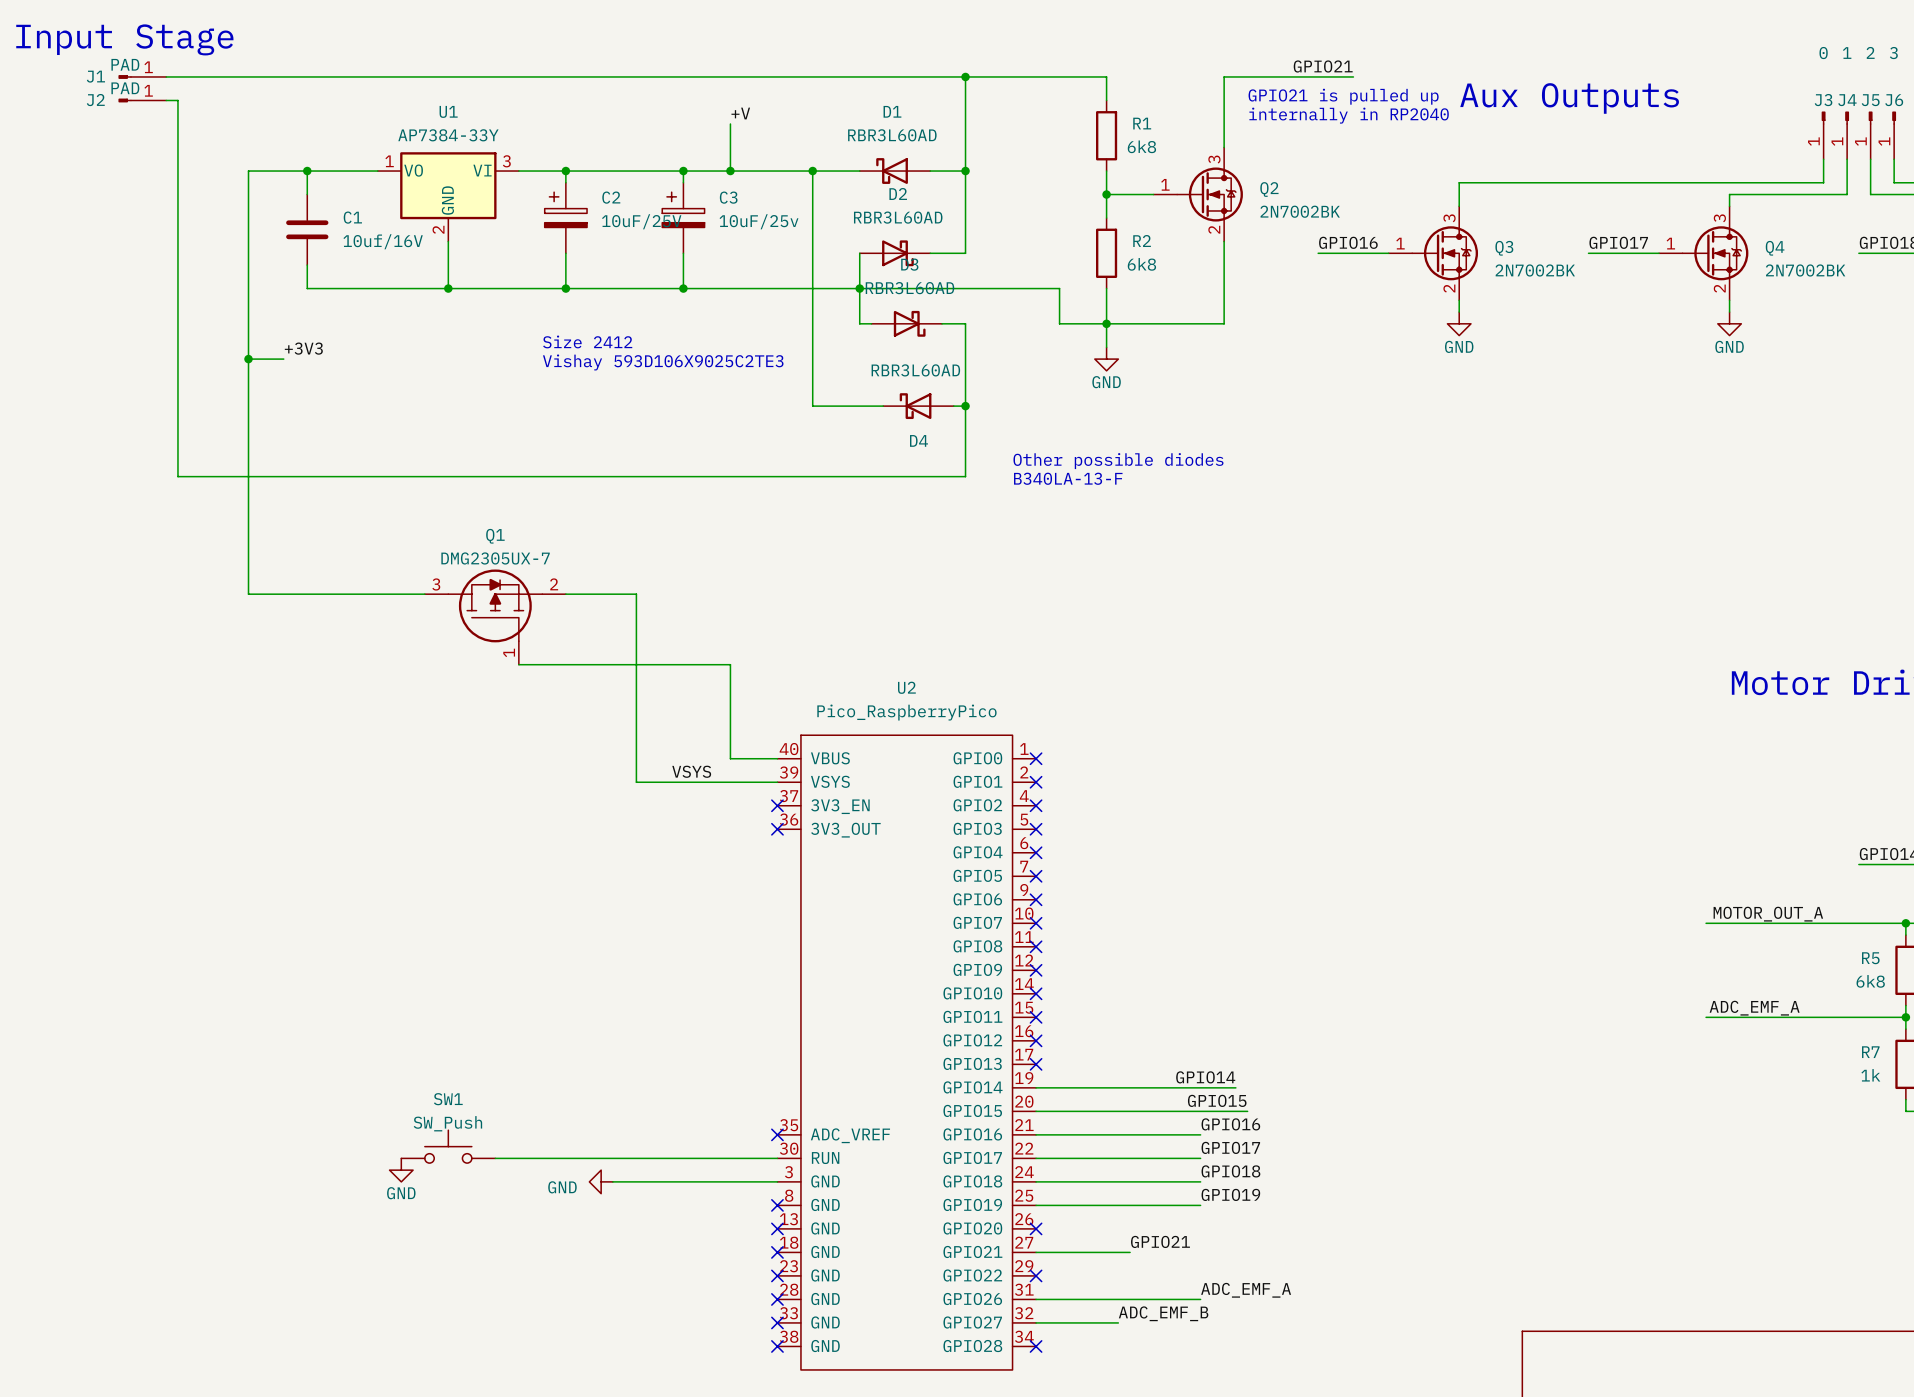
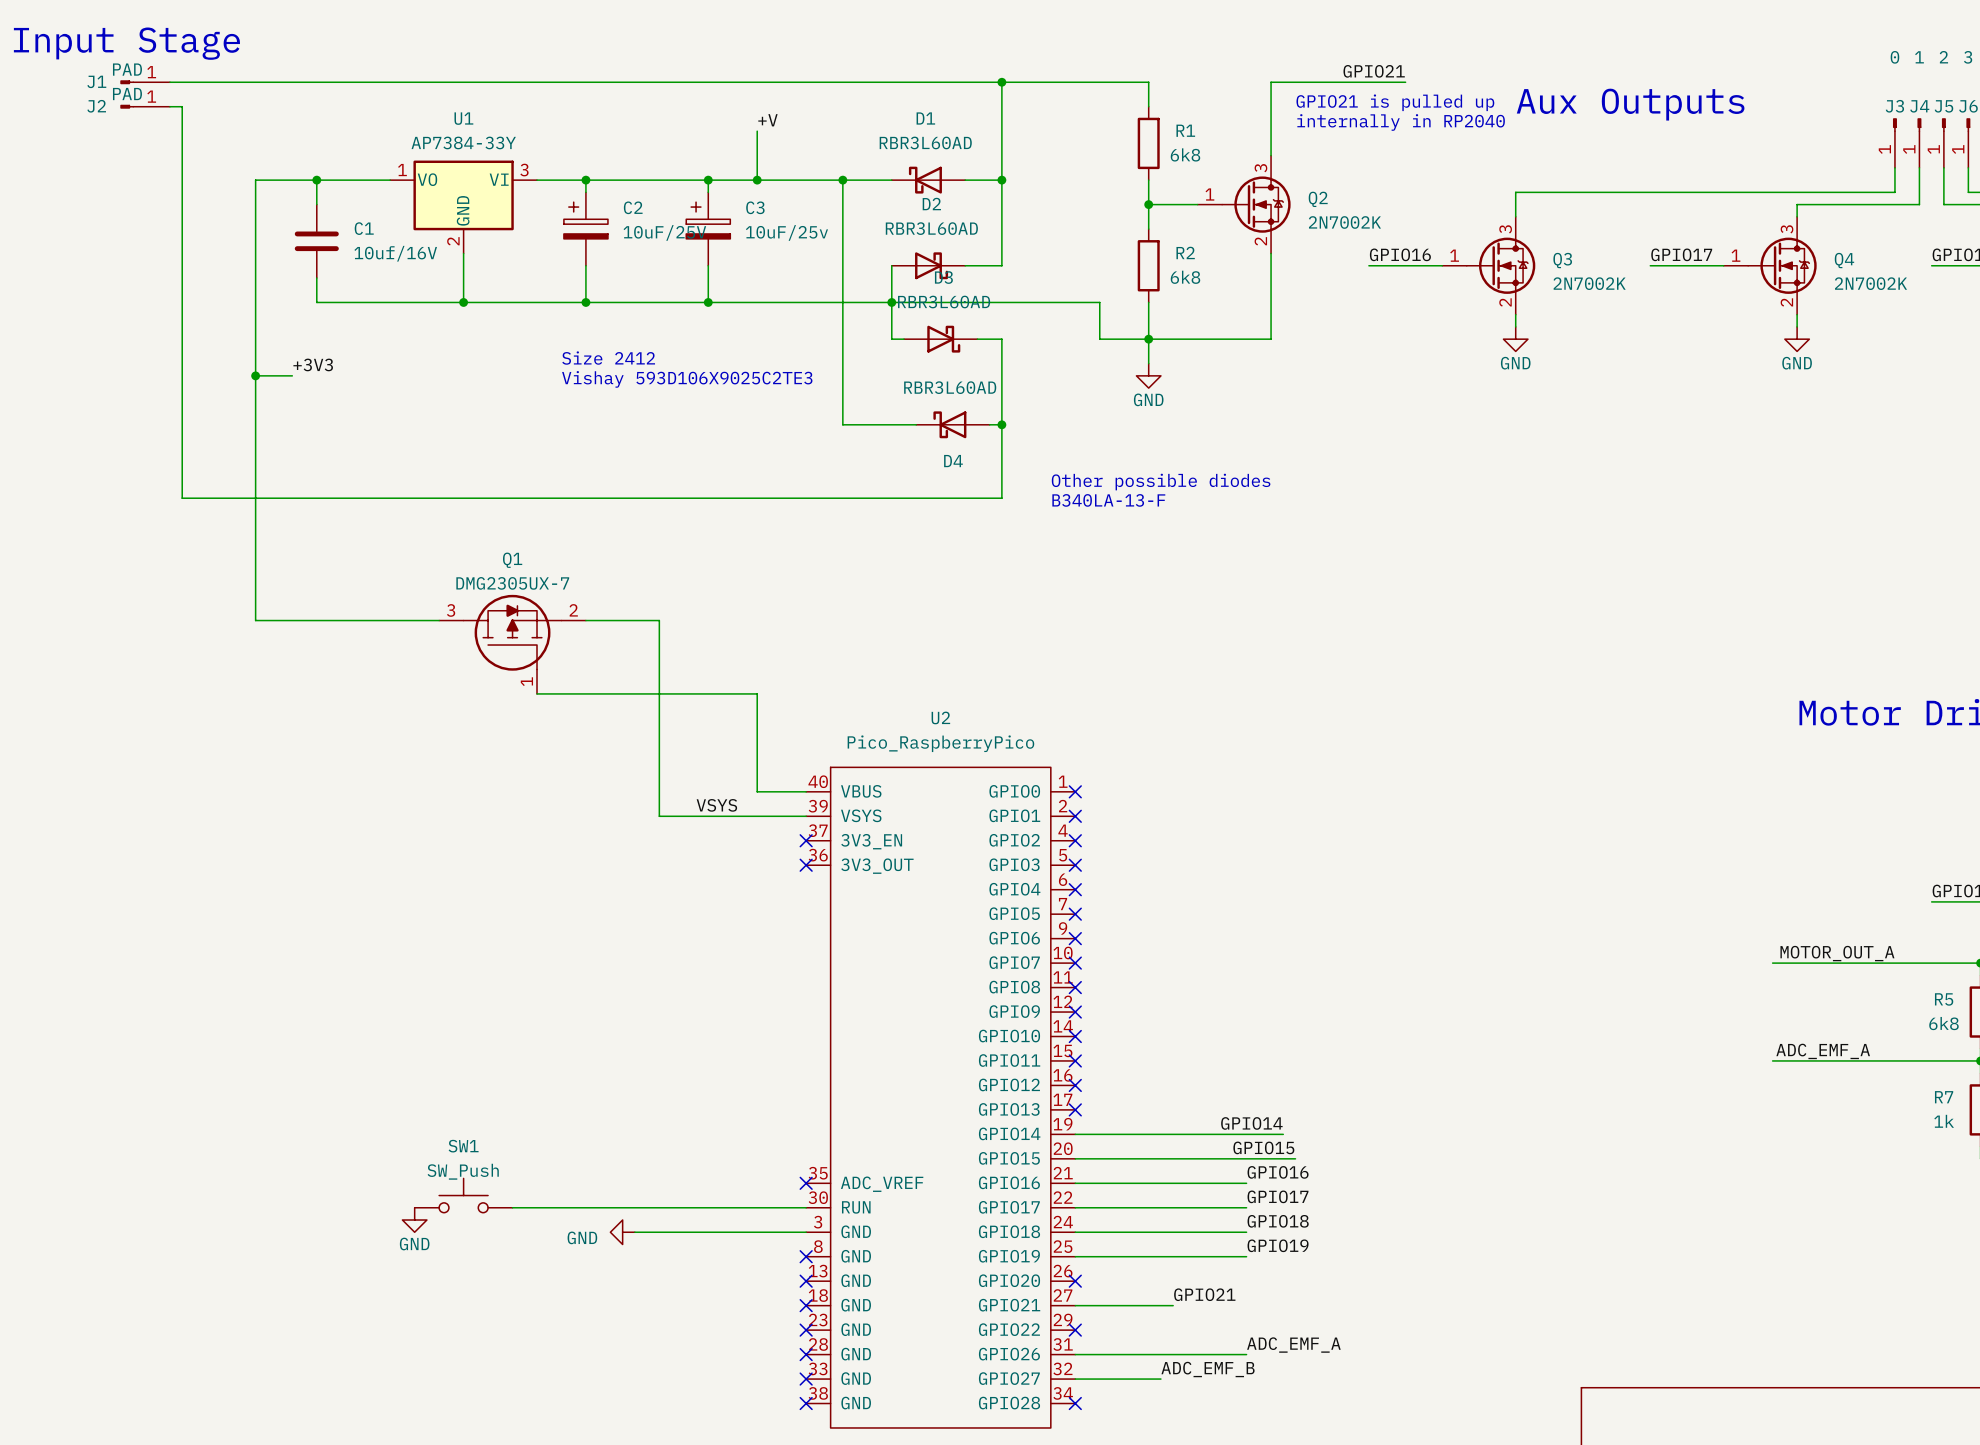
Q2 value: 2N7002BK (1300, 211) -> 2N7002K (1344, 222)
Q3 value: 2N7002BK (1535, 270) -> 2N7002K (1589, 283)
Q4 value: 2N7002BK (1805, 270) -> 2N7002K (1870, 283)

